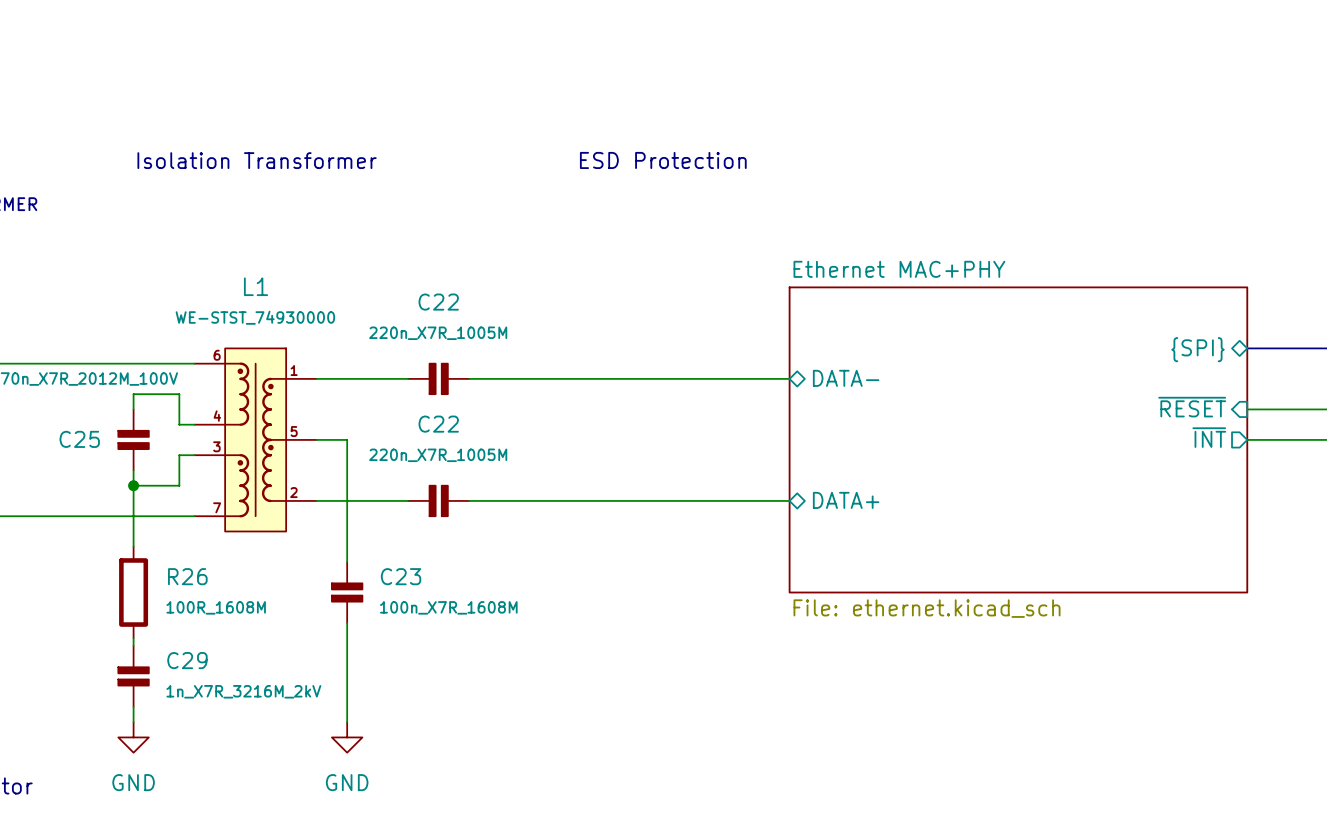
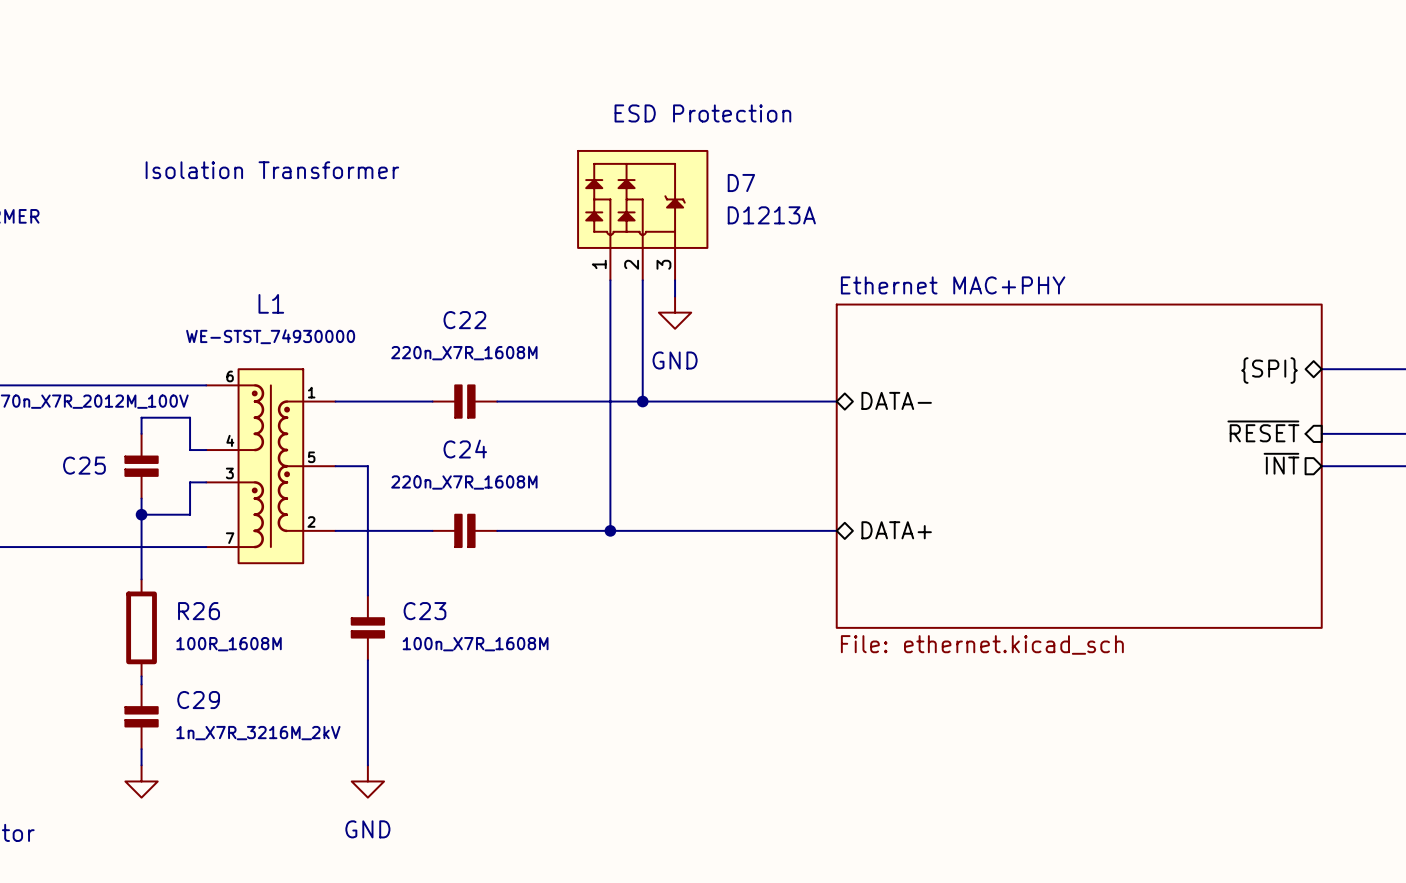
text position: ESD Protection (663, 160) -> ESD Protection (702, 113)
D7: none -> D1213A (642, 215)
wire: none -> (610, 280) (610, 530)
wire: none -> (642, 280) (642, 401)
wire: none -> (675, 280) (675, 296)
power symbol: none -> GND (675, 312)
C22 value: 220n_X7R_1005M (438, 333) -> 220n_X7R_1608M (464, 353)
junction: none -> (642, 401)
C22 name: C22 (438, 424) -> C24 (465, 449)
C22 value: 220n_X7R_1005M (438, 455) -> 220n_X7R_1608M (464, 482)
junction: none -> (610, 530)
power symbol text: GND (133, 782) -> none

